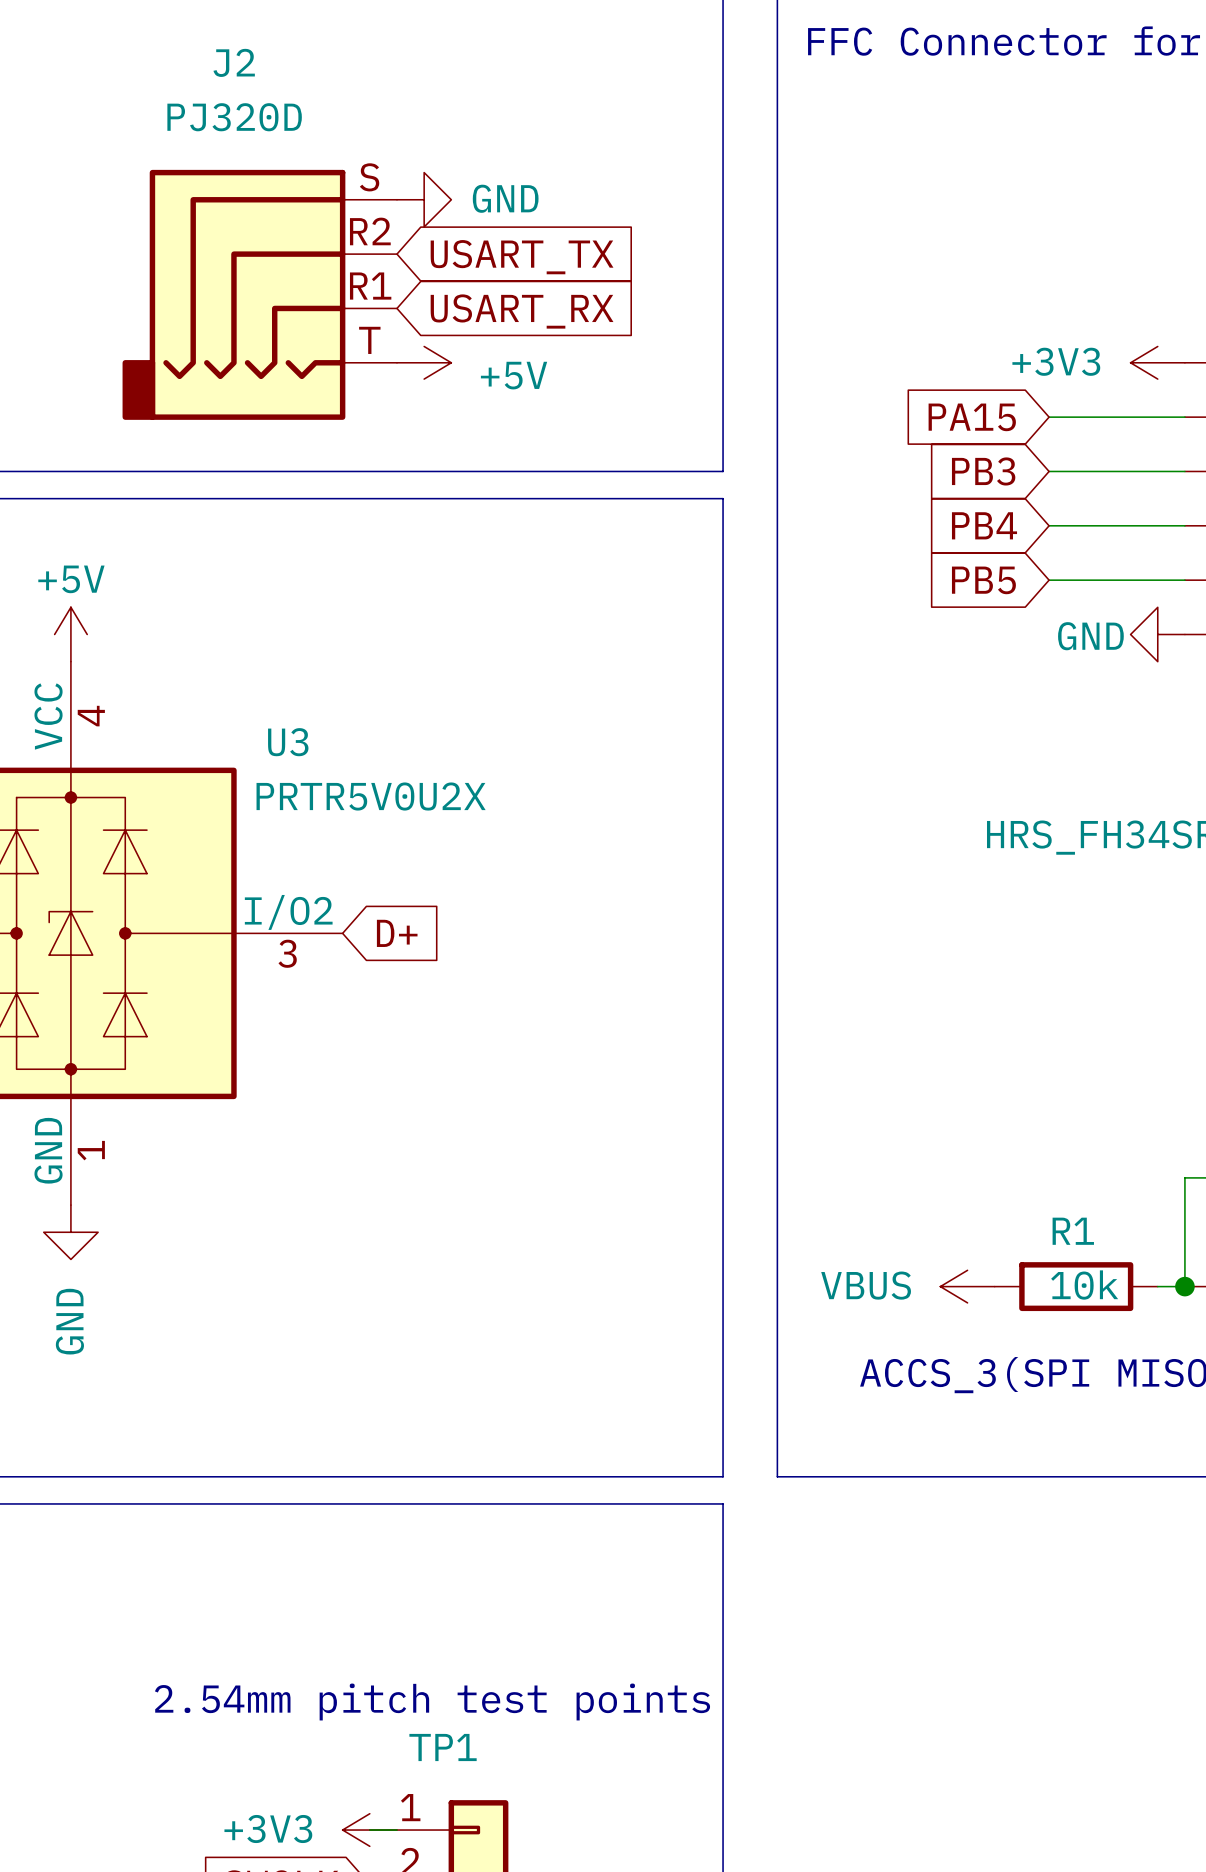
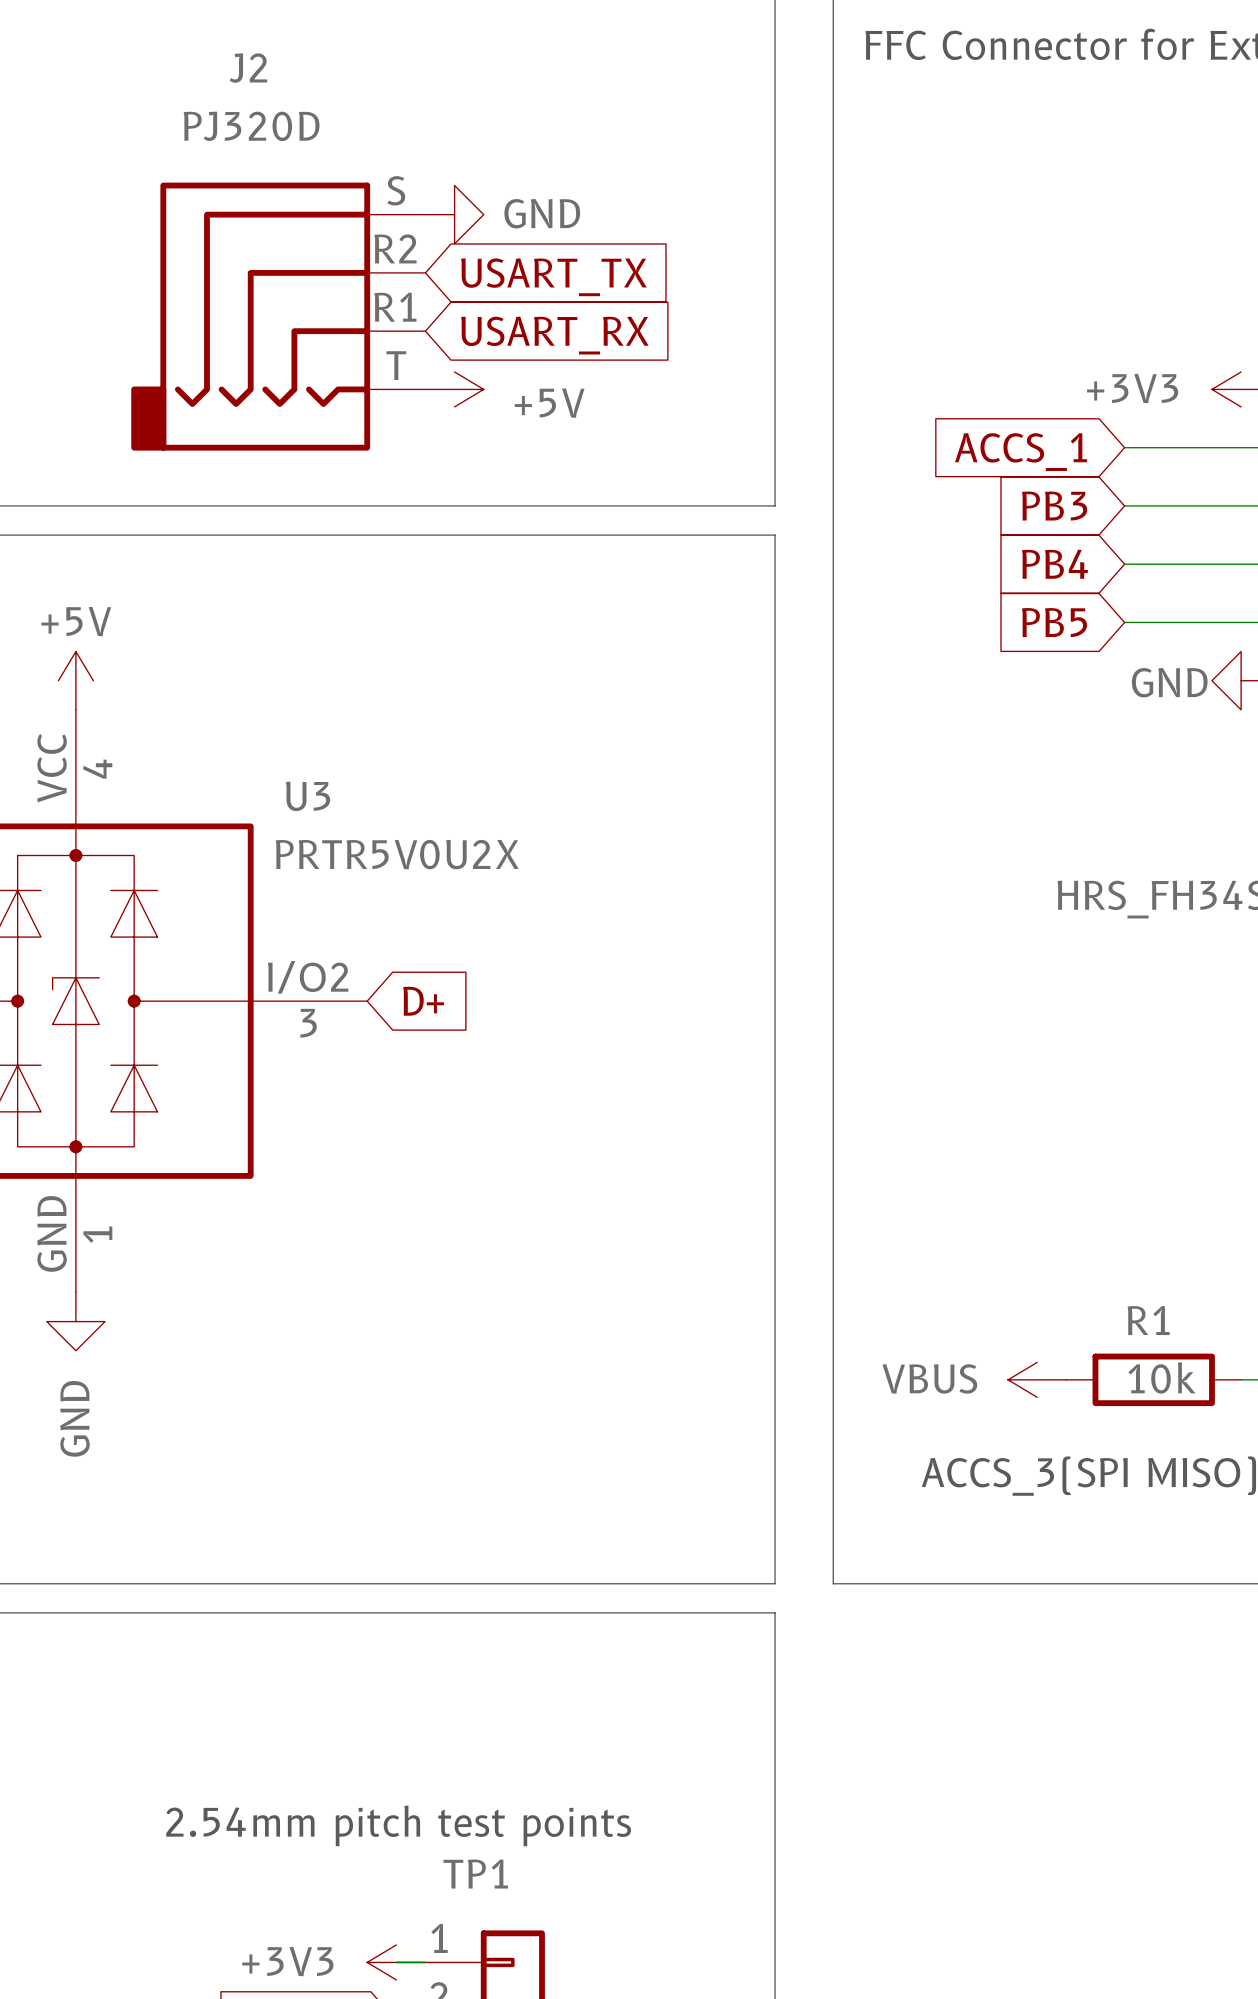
global label: PA15 (972, 417) -> ACCS_1 (1021, 452)

